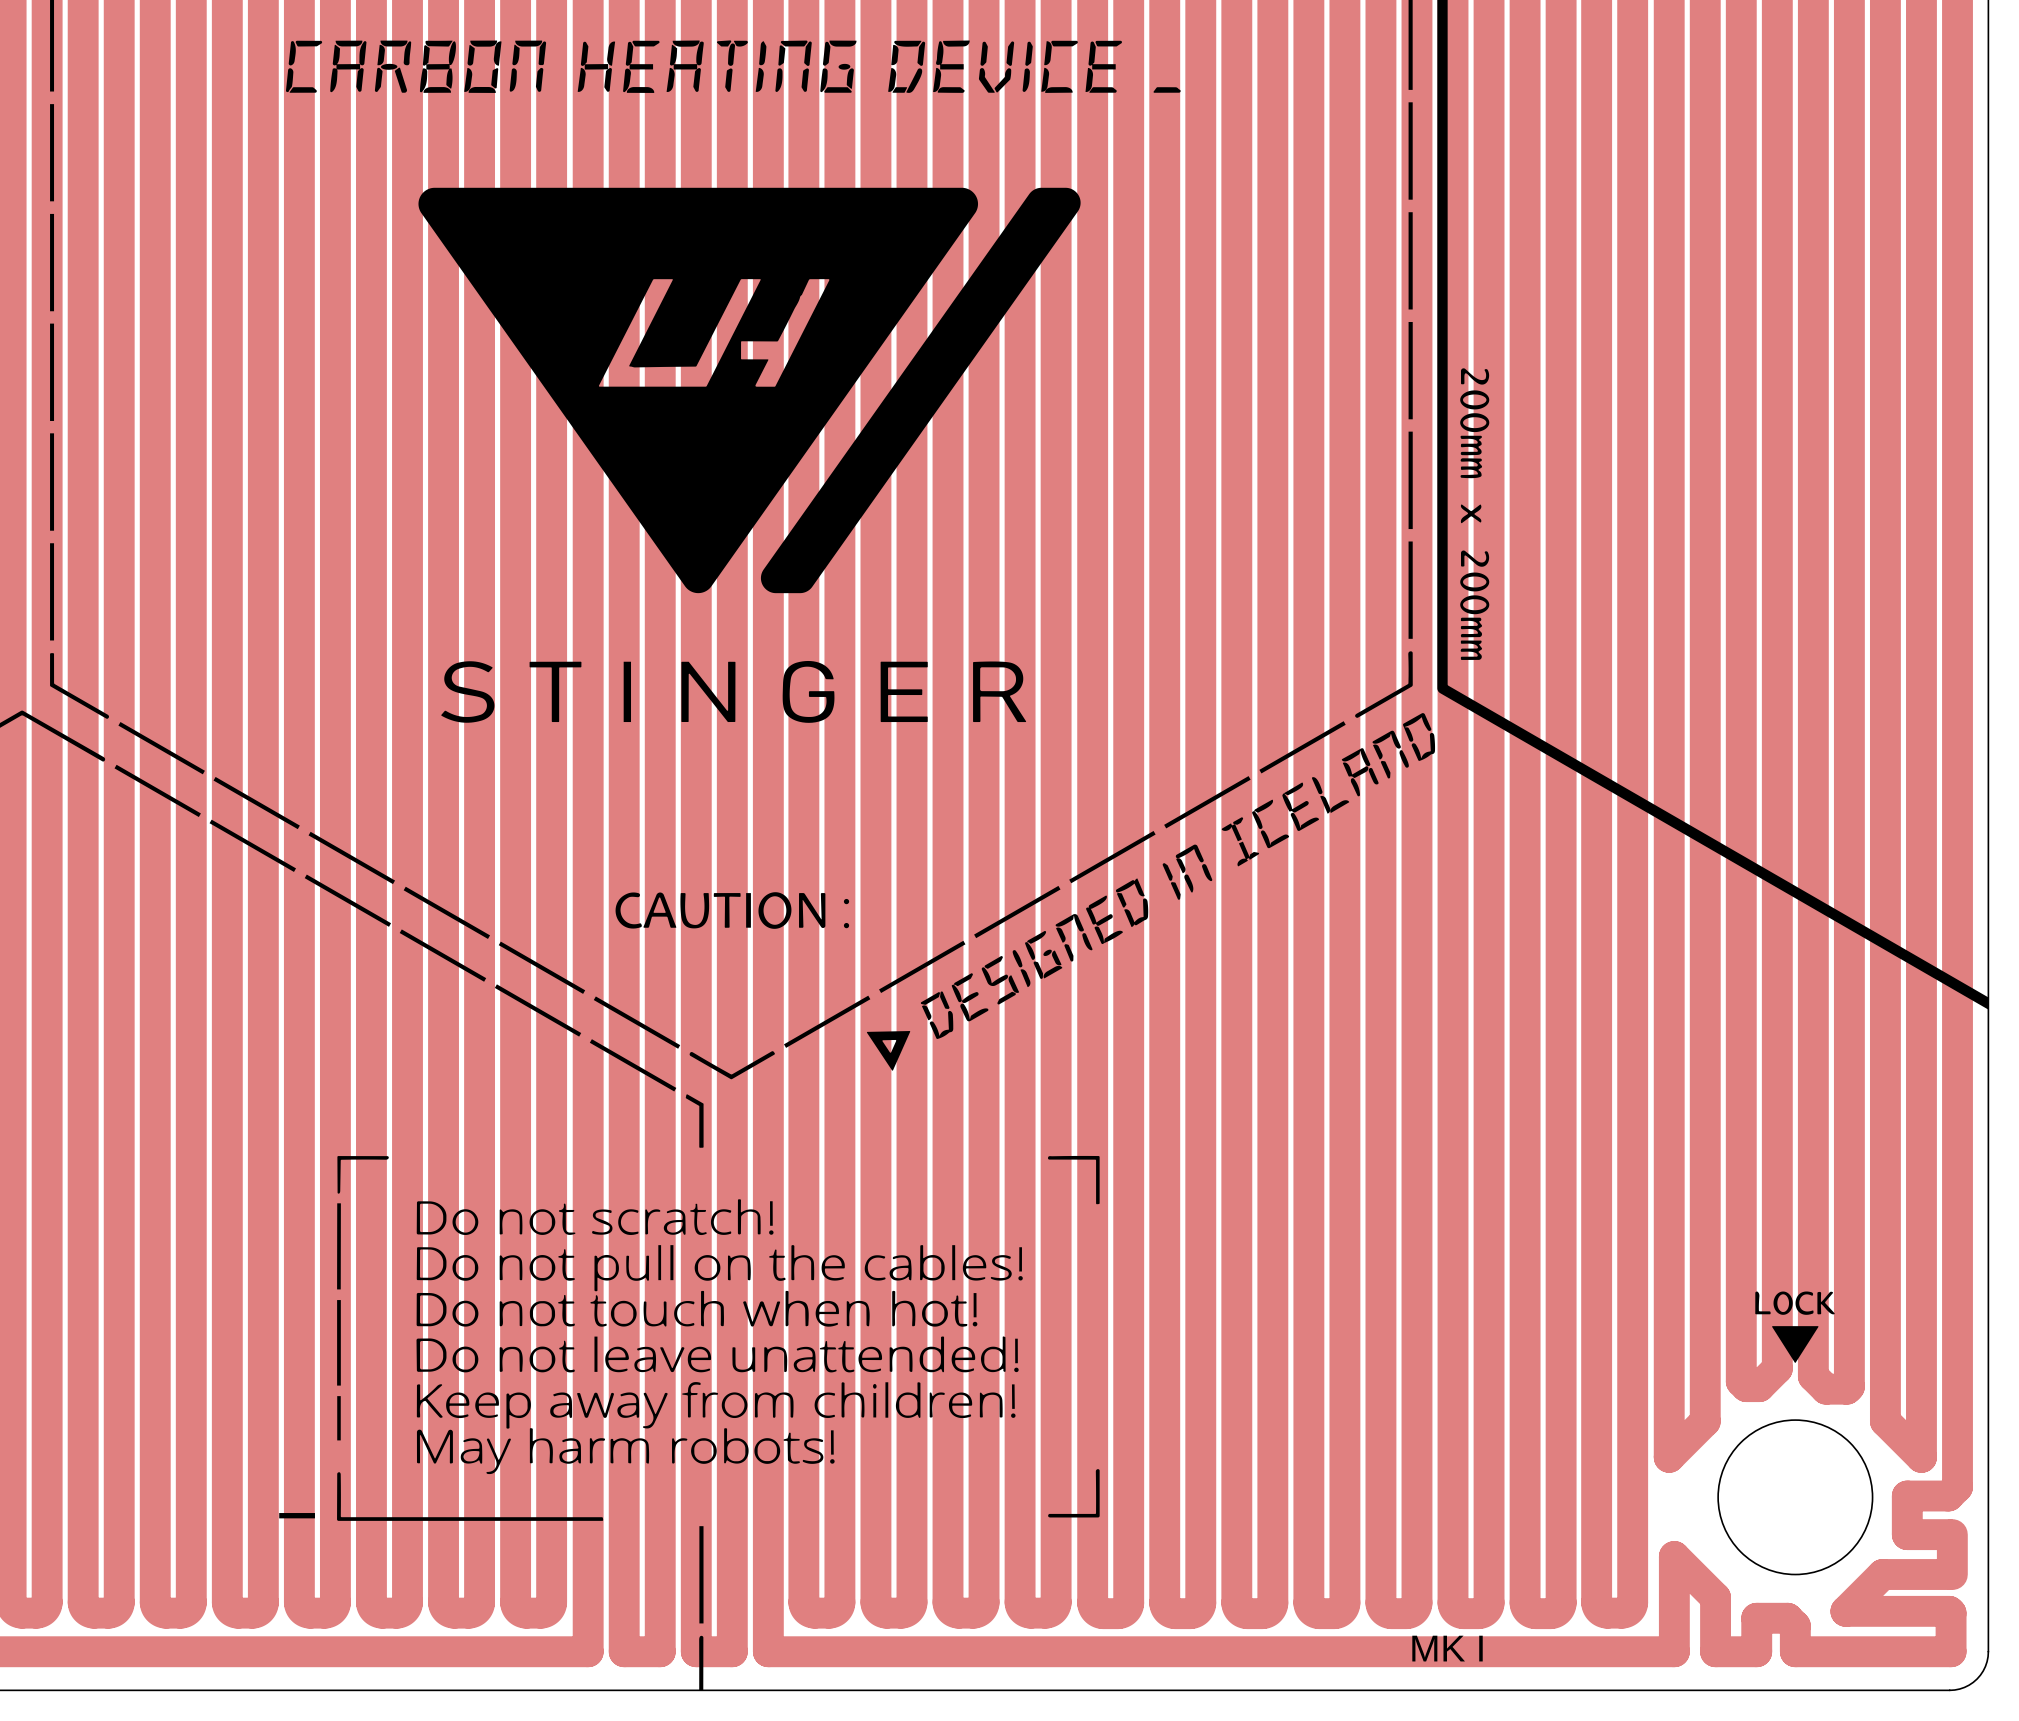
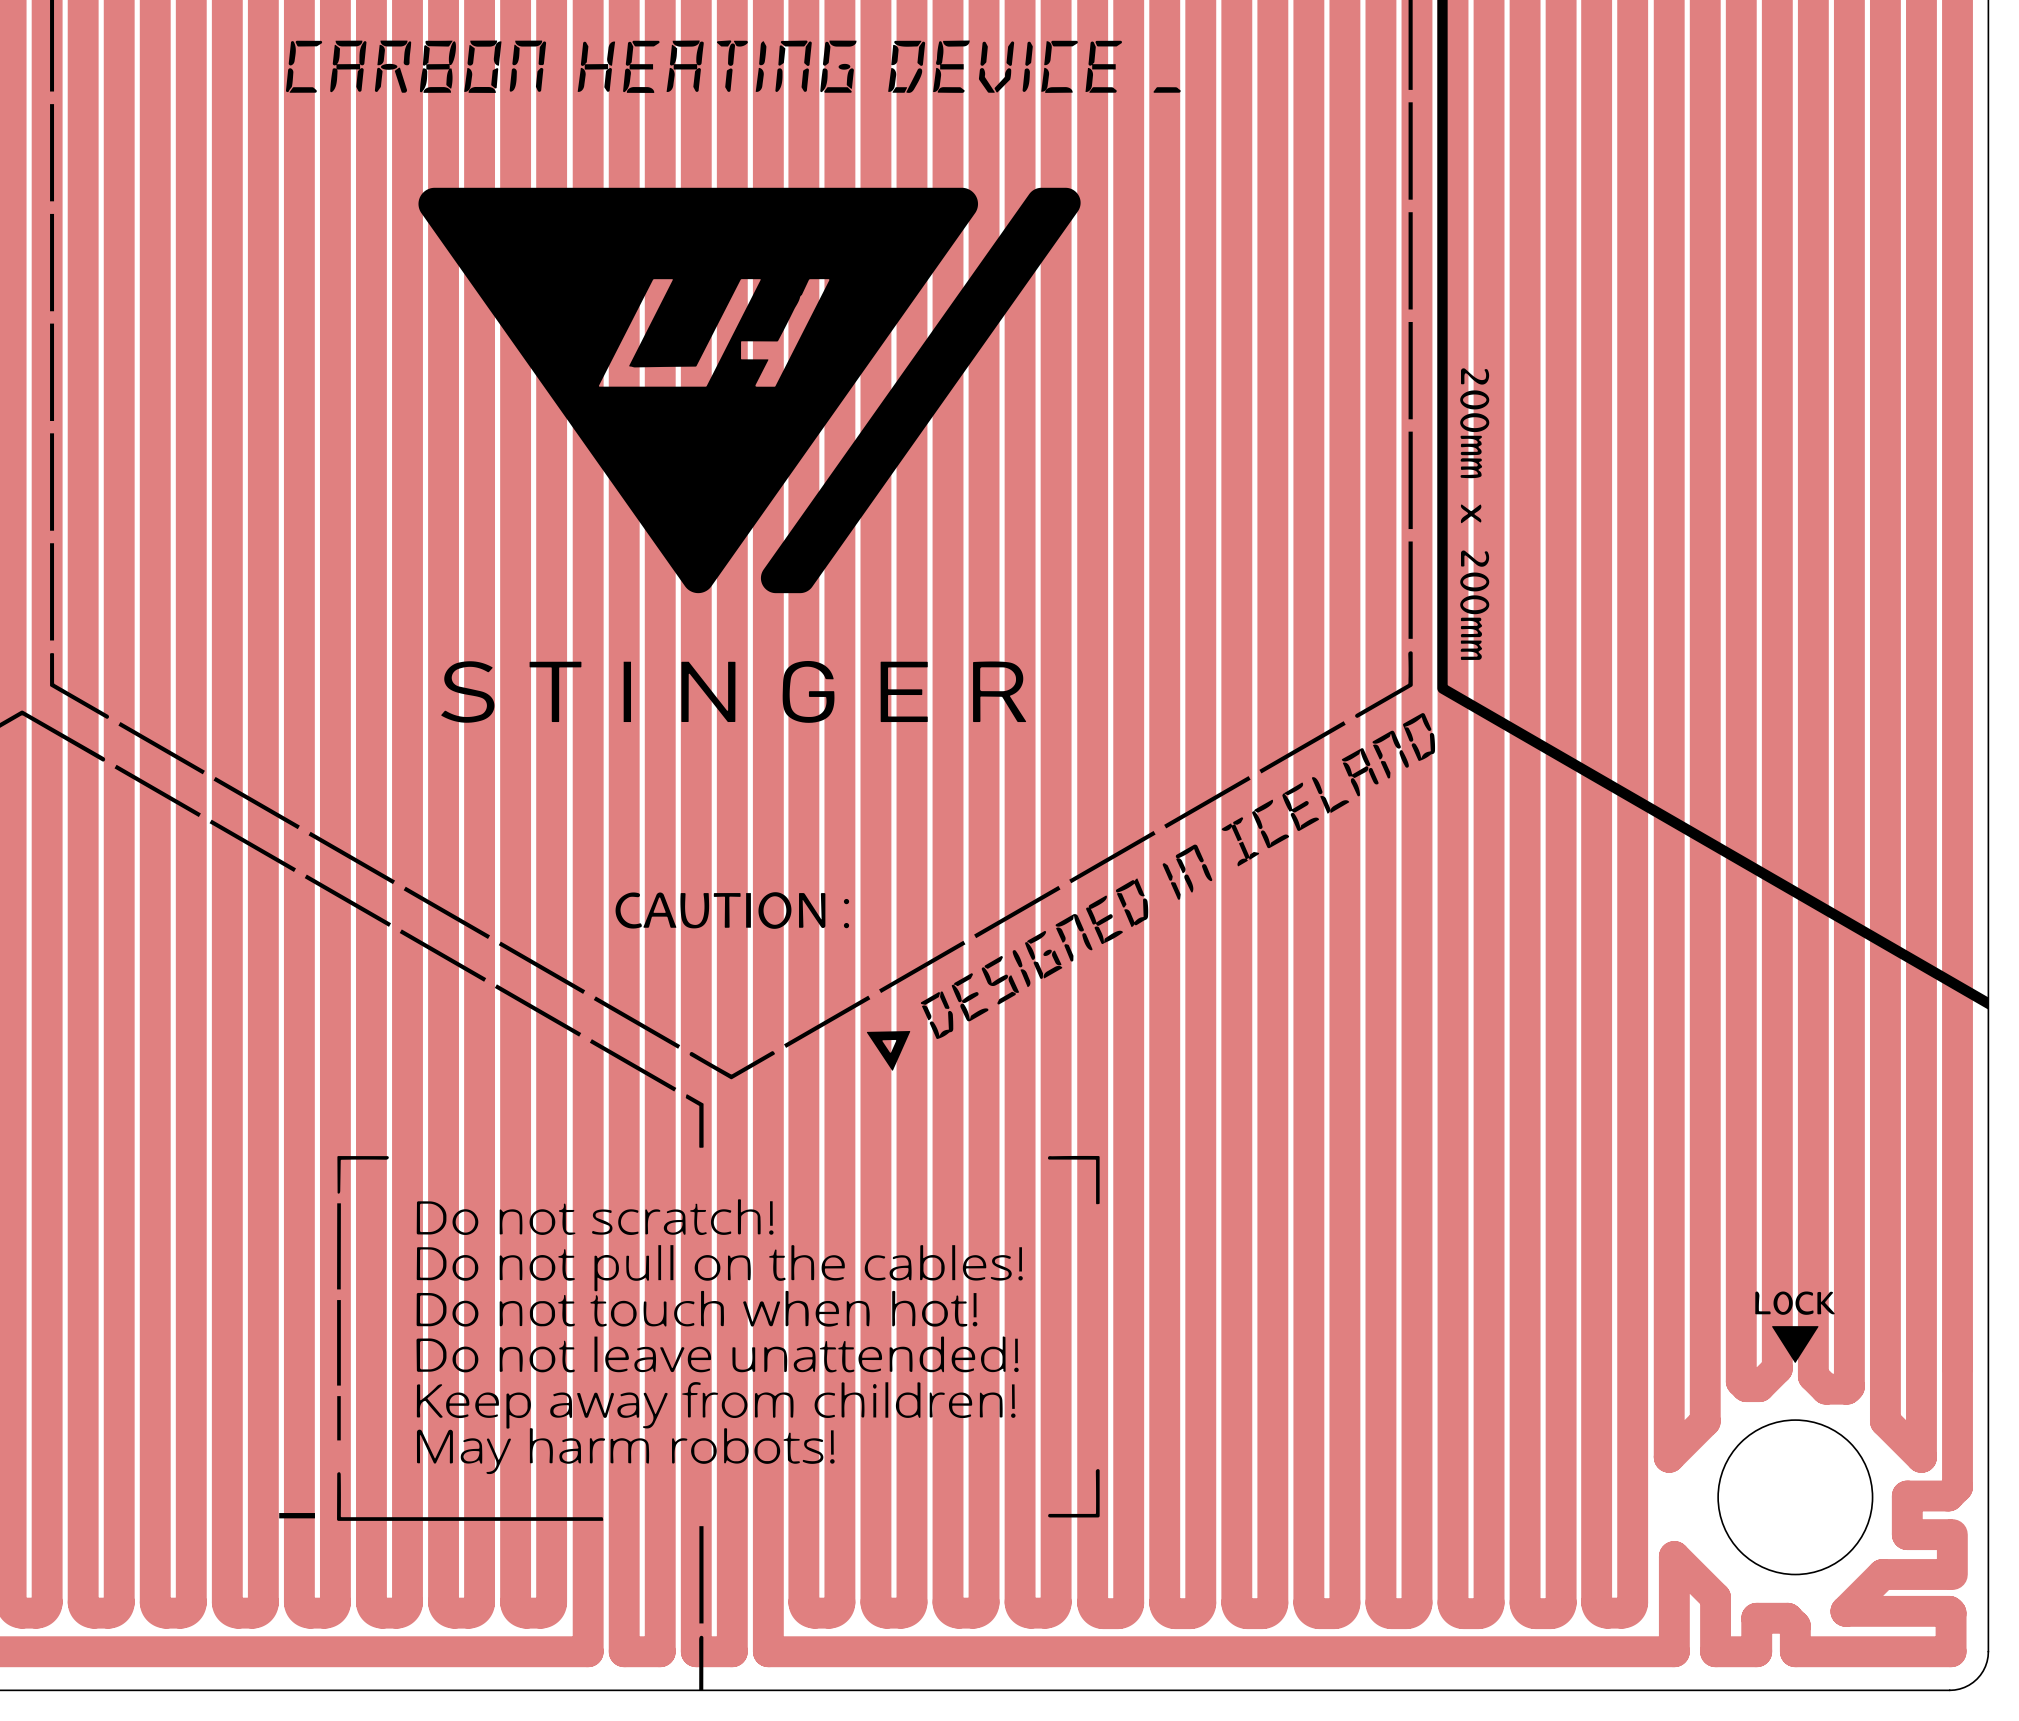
text: MK I (1447, 1648) -> none

